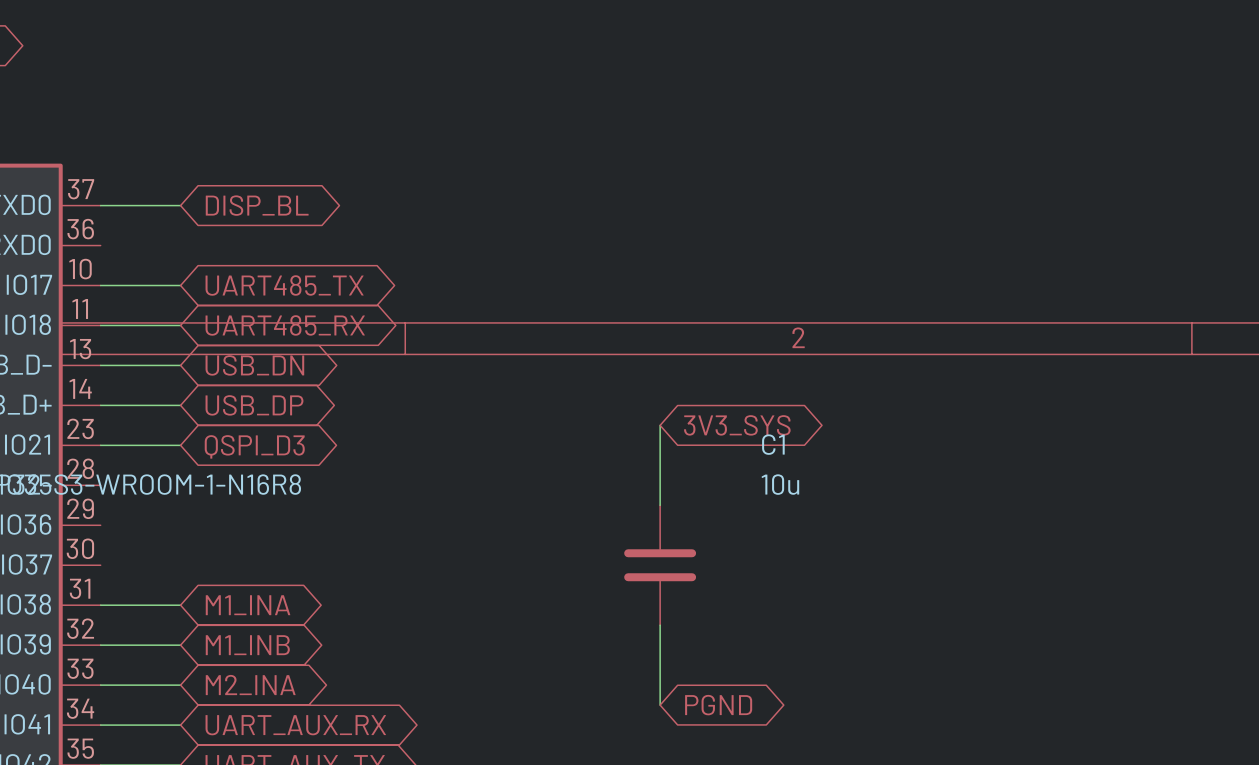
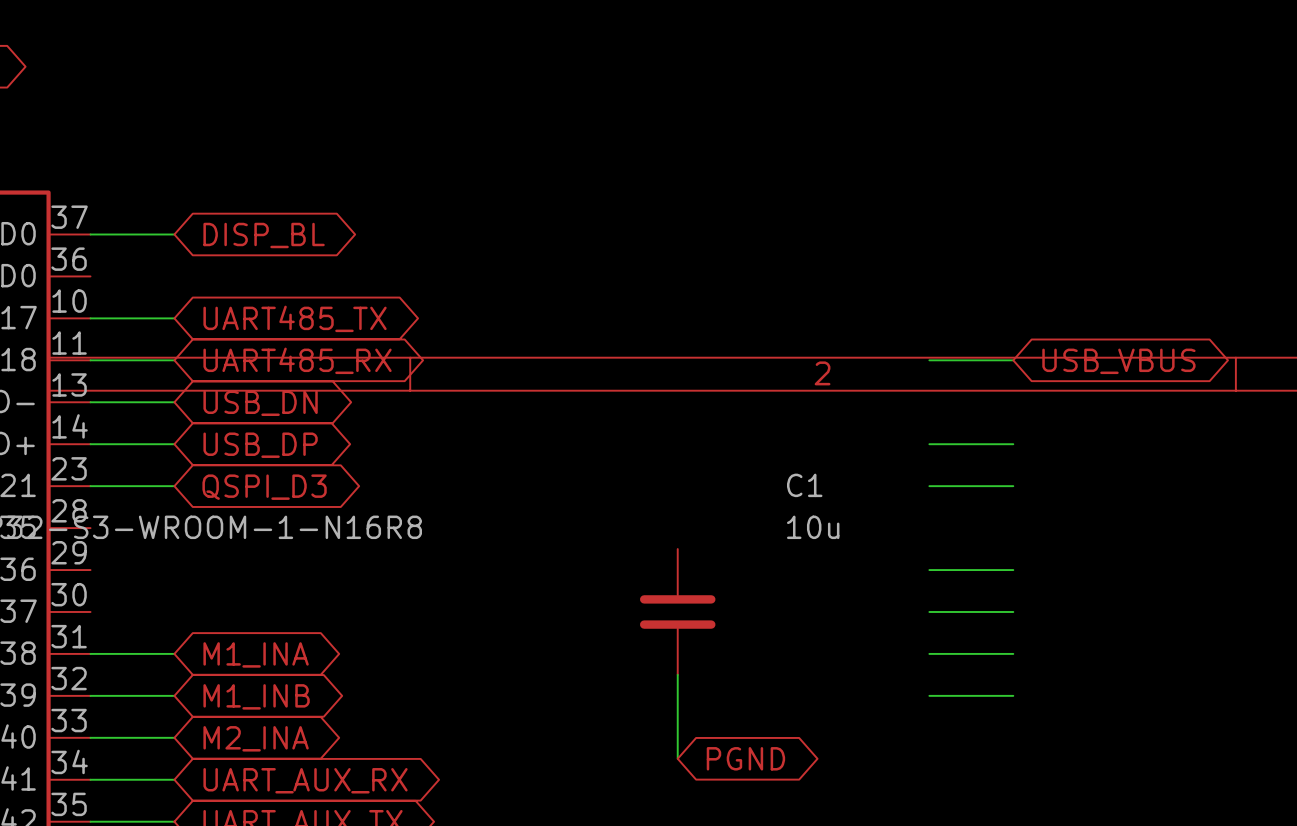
wire: none -> (929, 360) (1013, 360)
global label: none -> USB_VBUS (1118, 361)
wire: none -> (929, 444) (1013, 444)
wire: (660, 425) (660, 505) -> none
global label: 3V3_SYS (737, 425) -> none
wire: none -> (929, 486) (1013, 486)
wire: none -> (929, 570) (1013, 570)
wire: none -> (929, 611) (1013, 611)
wire: none -> (929, 653) (1013, 653)
wire: none -> (929, 695) (1013, 695)

